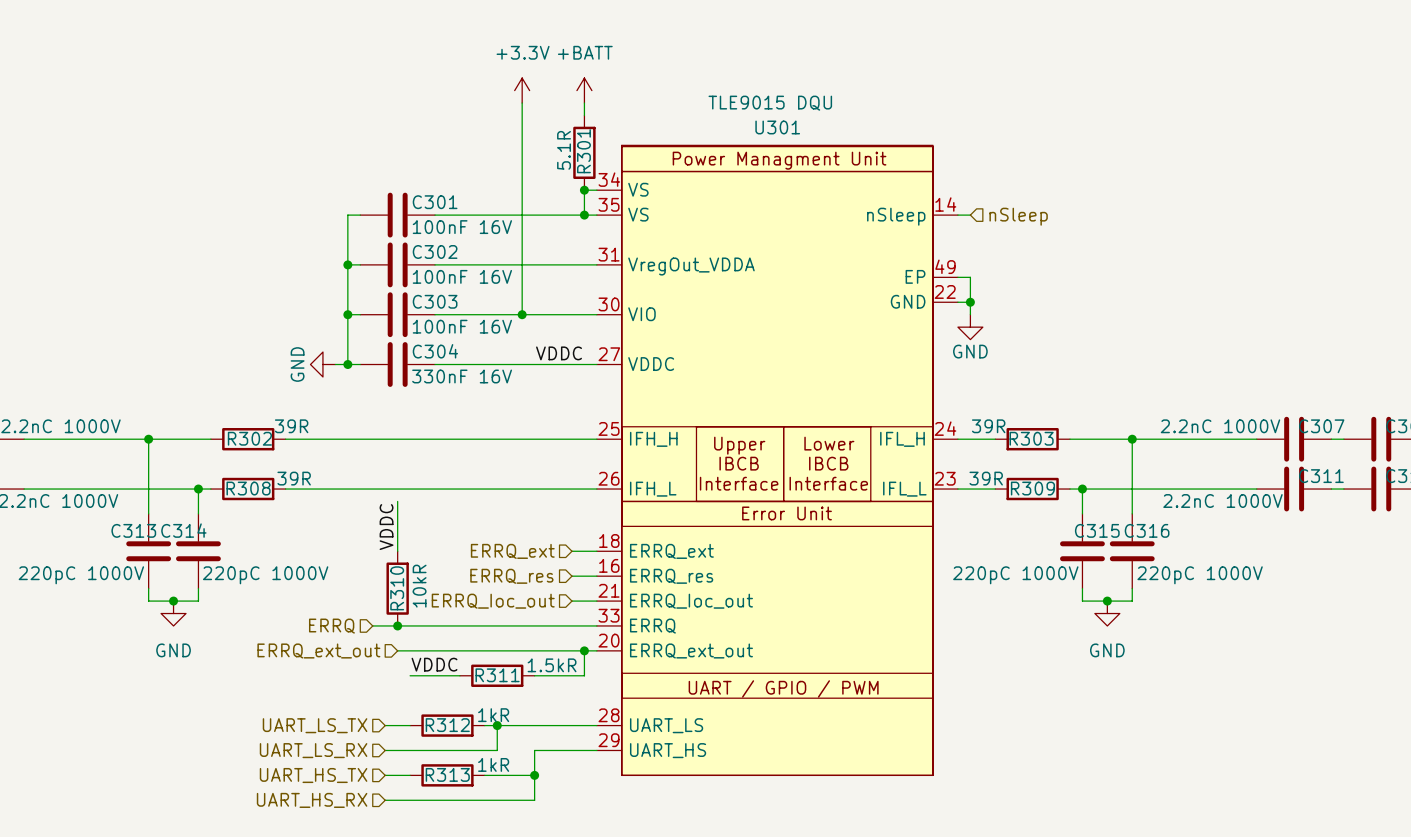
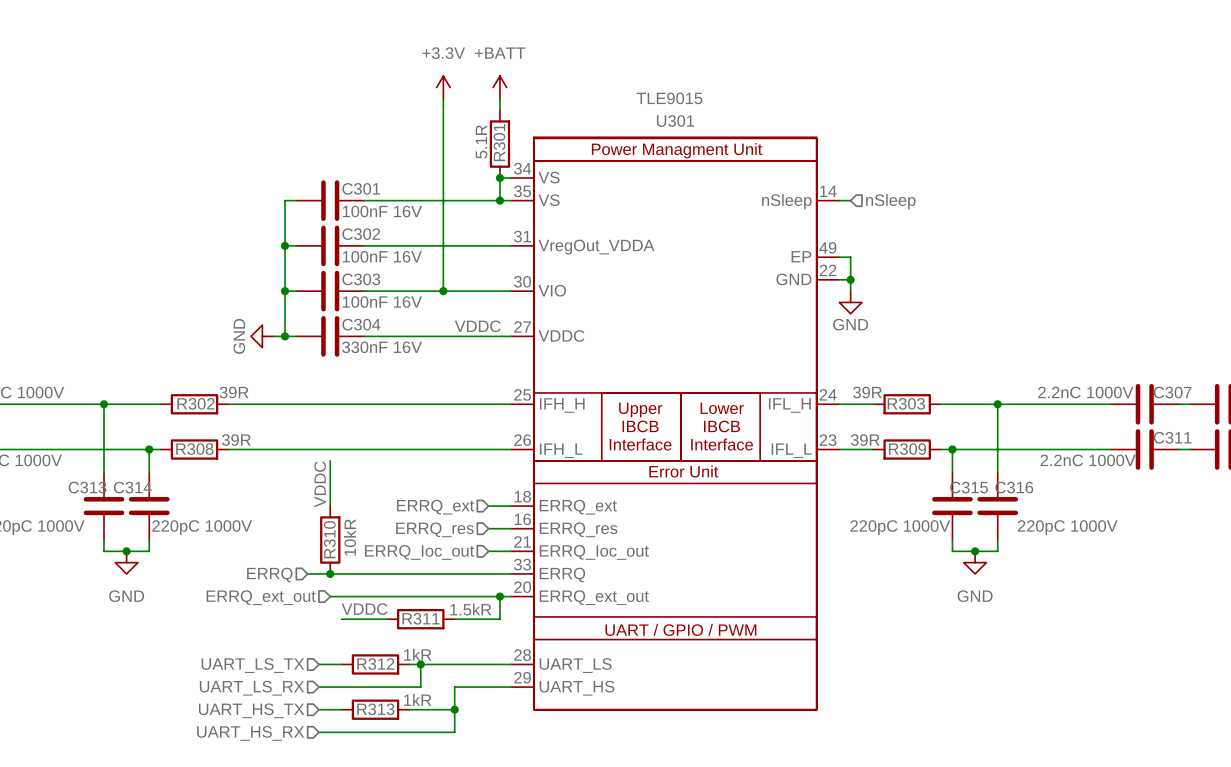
U301 value: TLE9015 DQU (770, 103) -> TLE9015 (669, 98)

